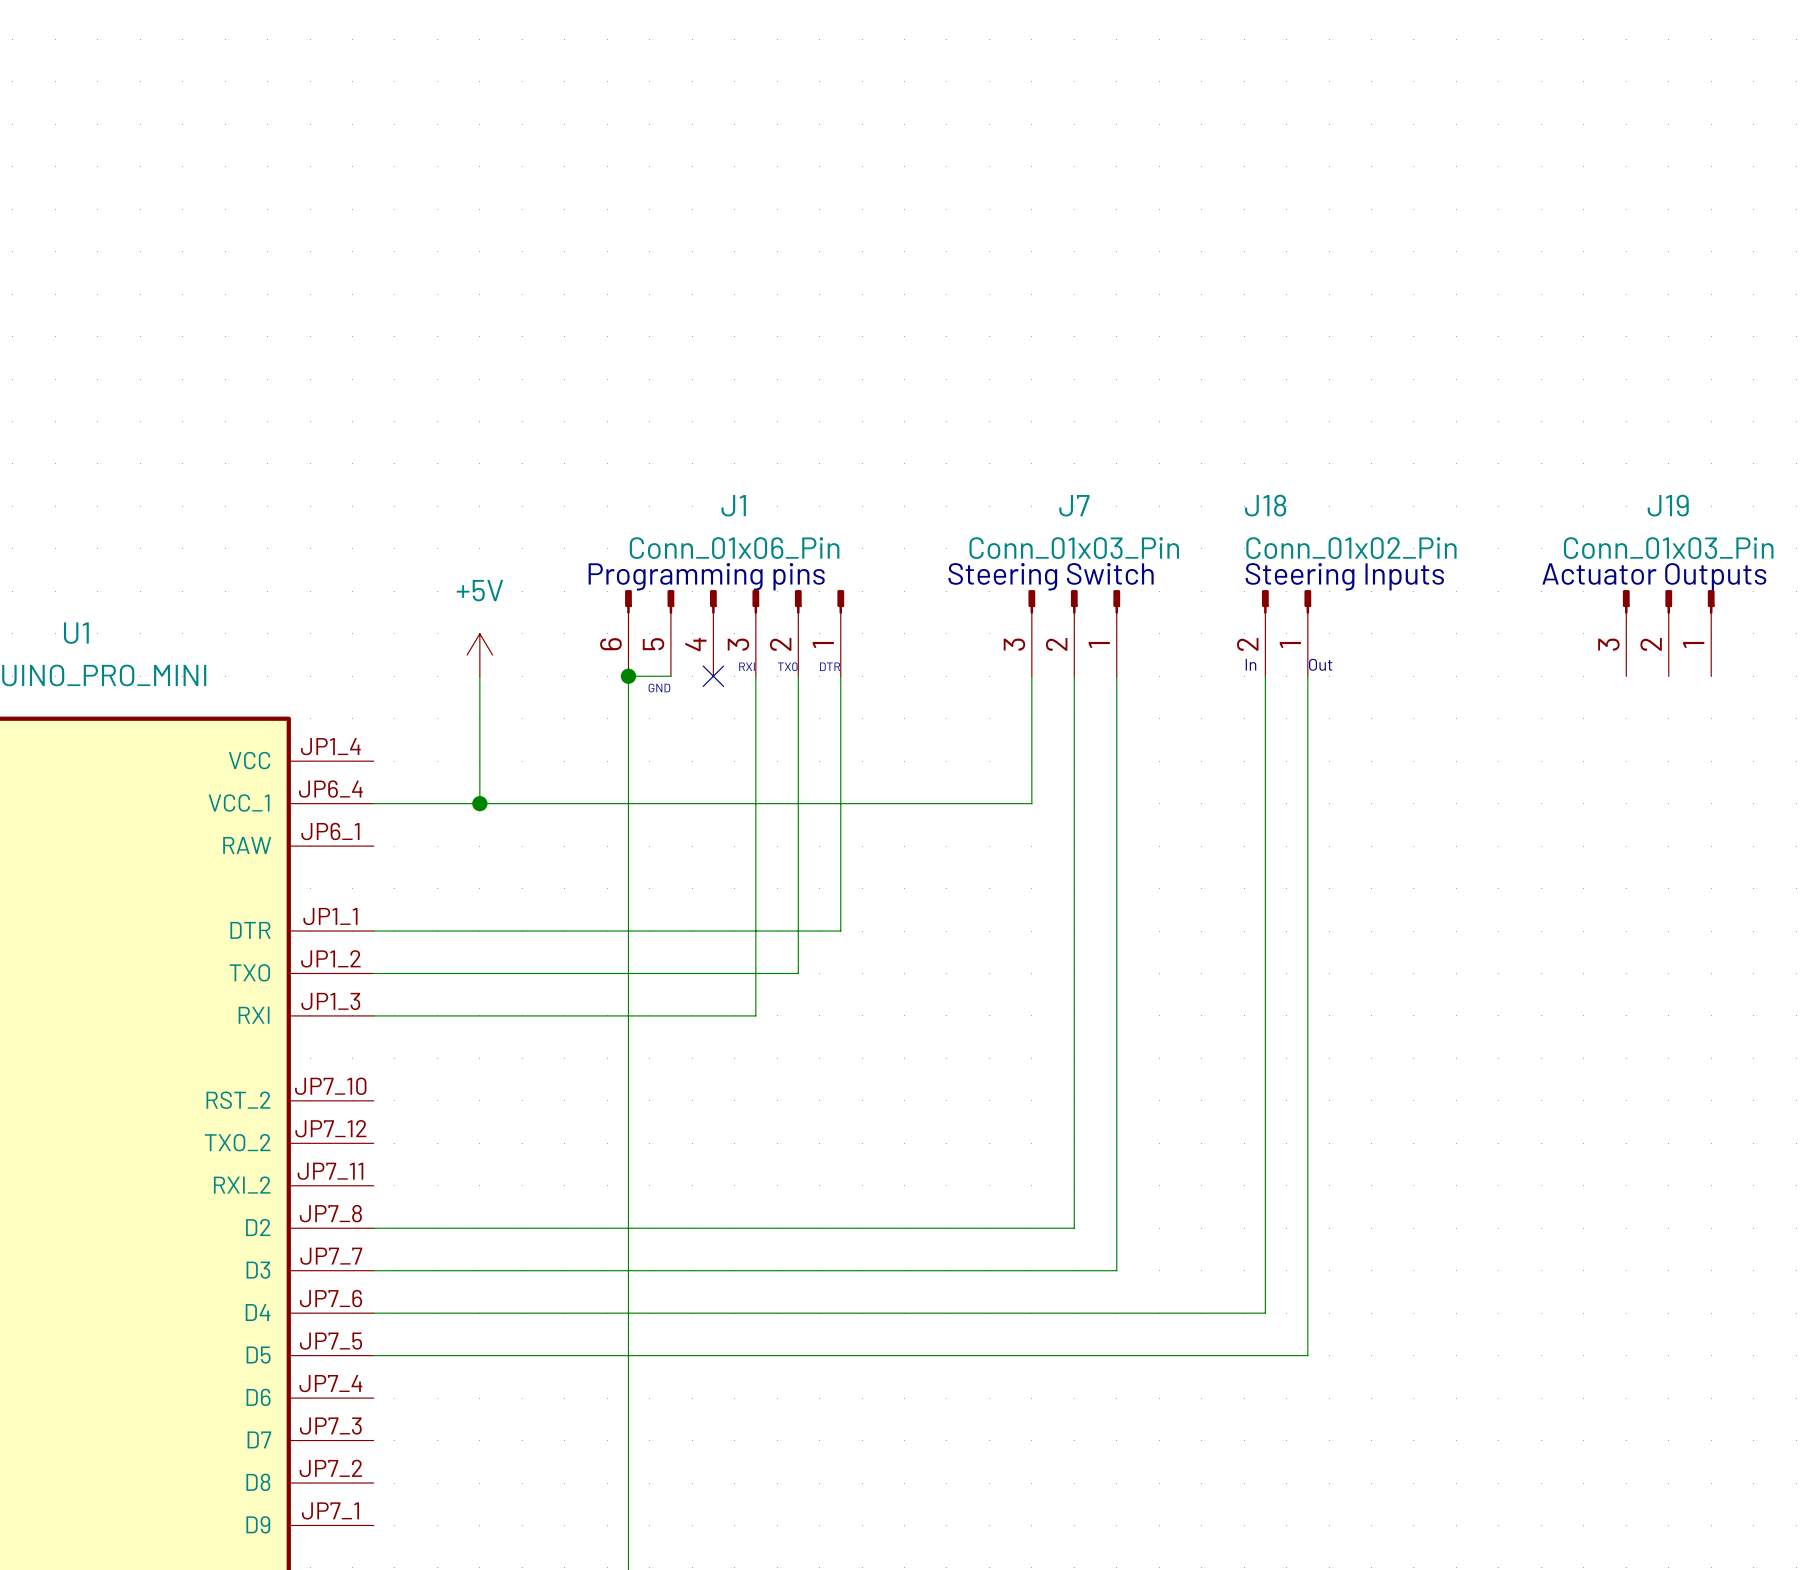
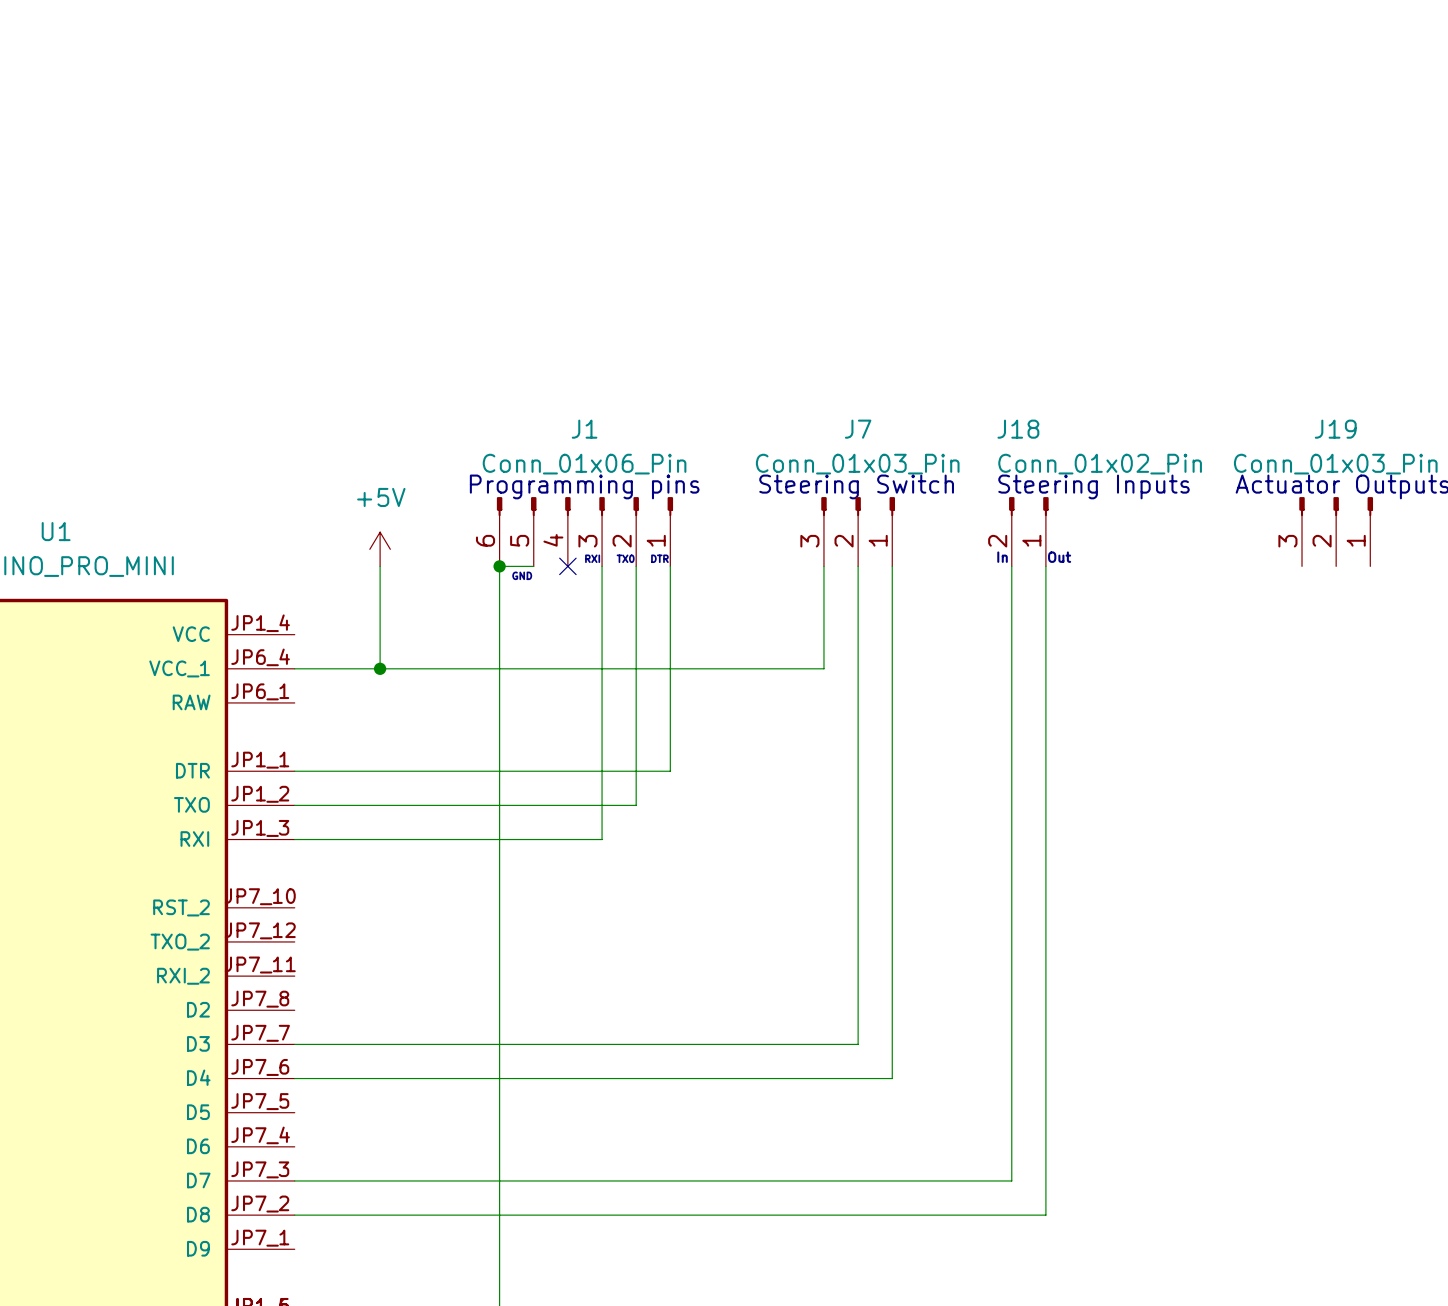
wire: (373, 1228) (1074, 1228) -> none
wire: (1074, 1270) (1116, 1270) -> (858, 1044) (858, 1010)
wire: (1116, 1313) (1265, 1313) -> (892, 1078) (892, 1044)
wire: none -> (1011, 1078) (1011, 1180) (294, 1180)
wire: (373, 1355) (1307, 1355) -> (294, 1215) (1045, 1215) (1045, 1112)

